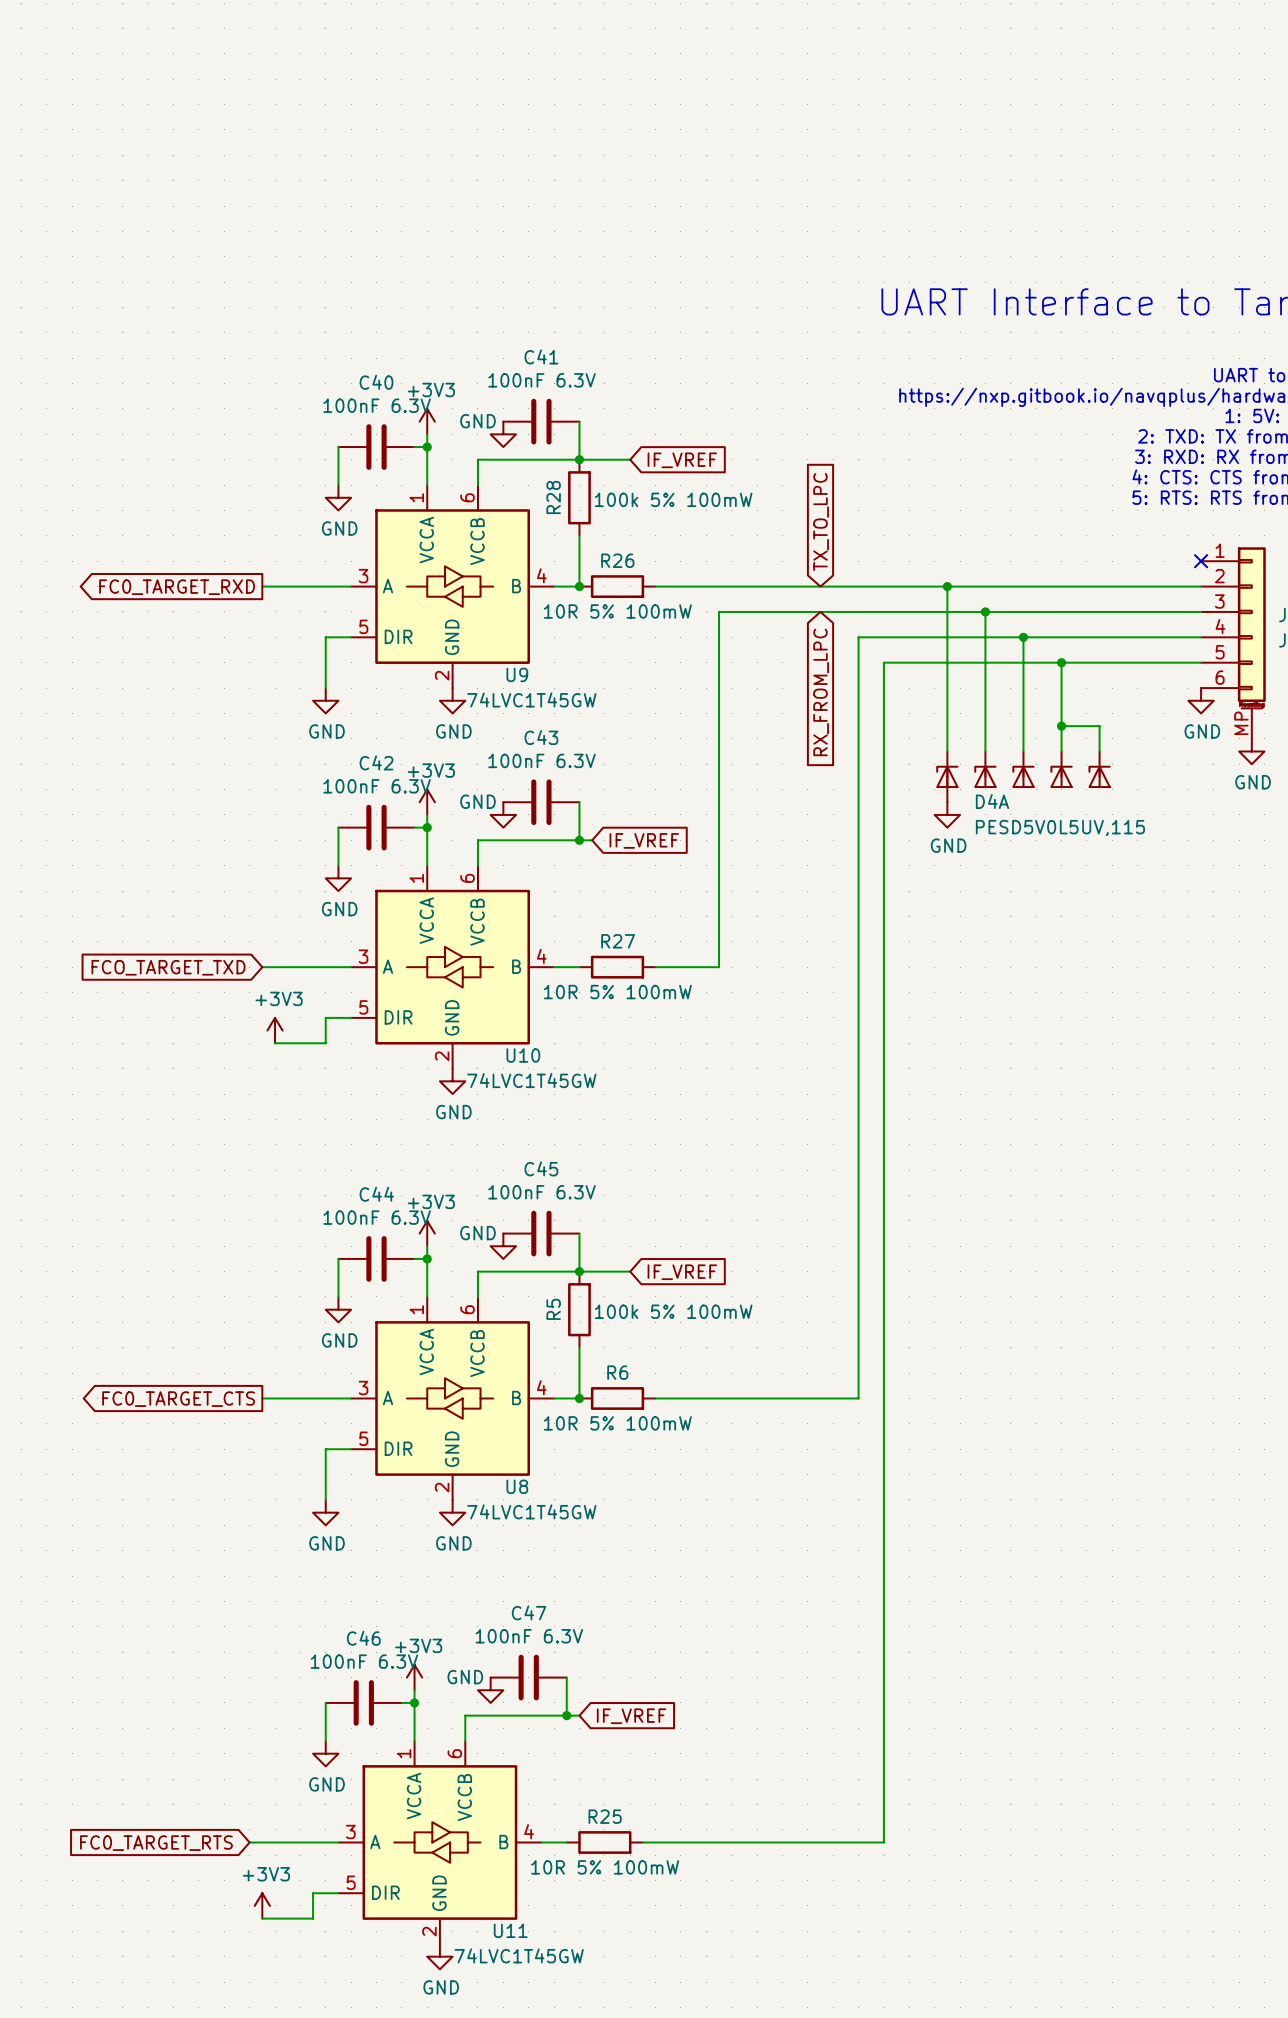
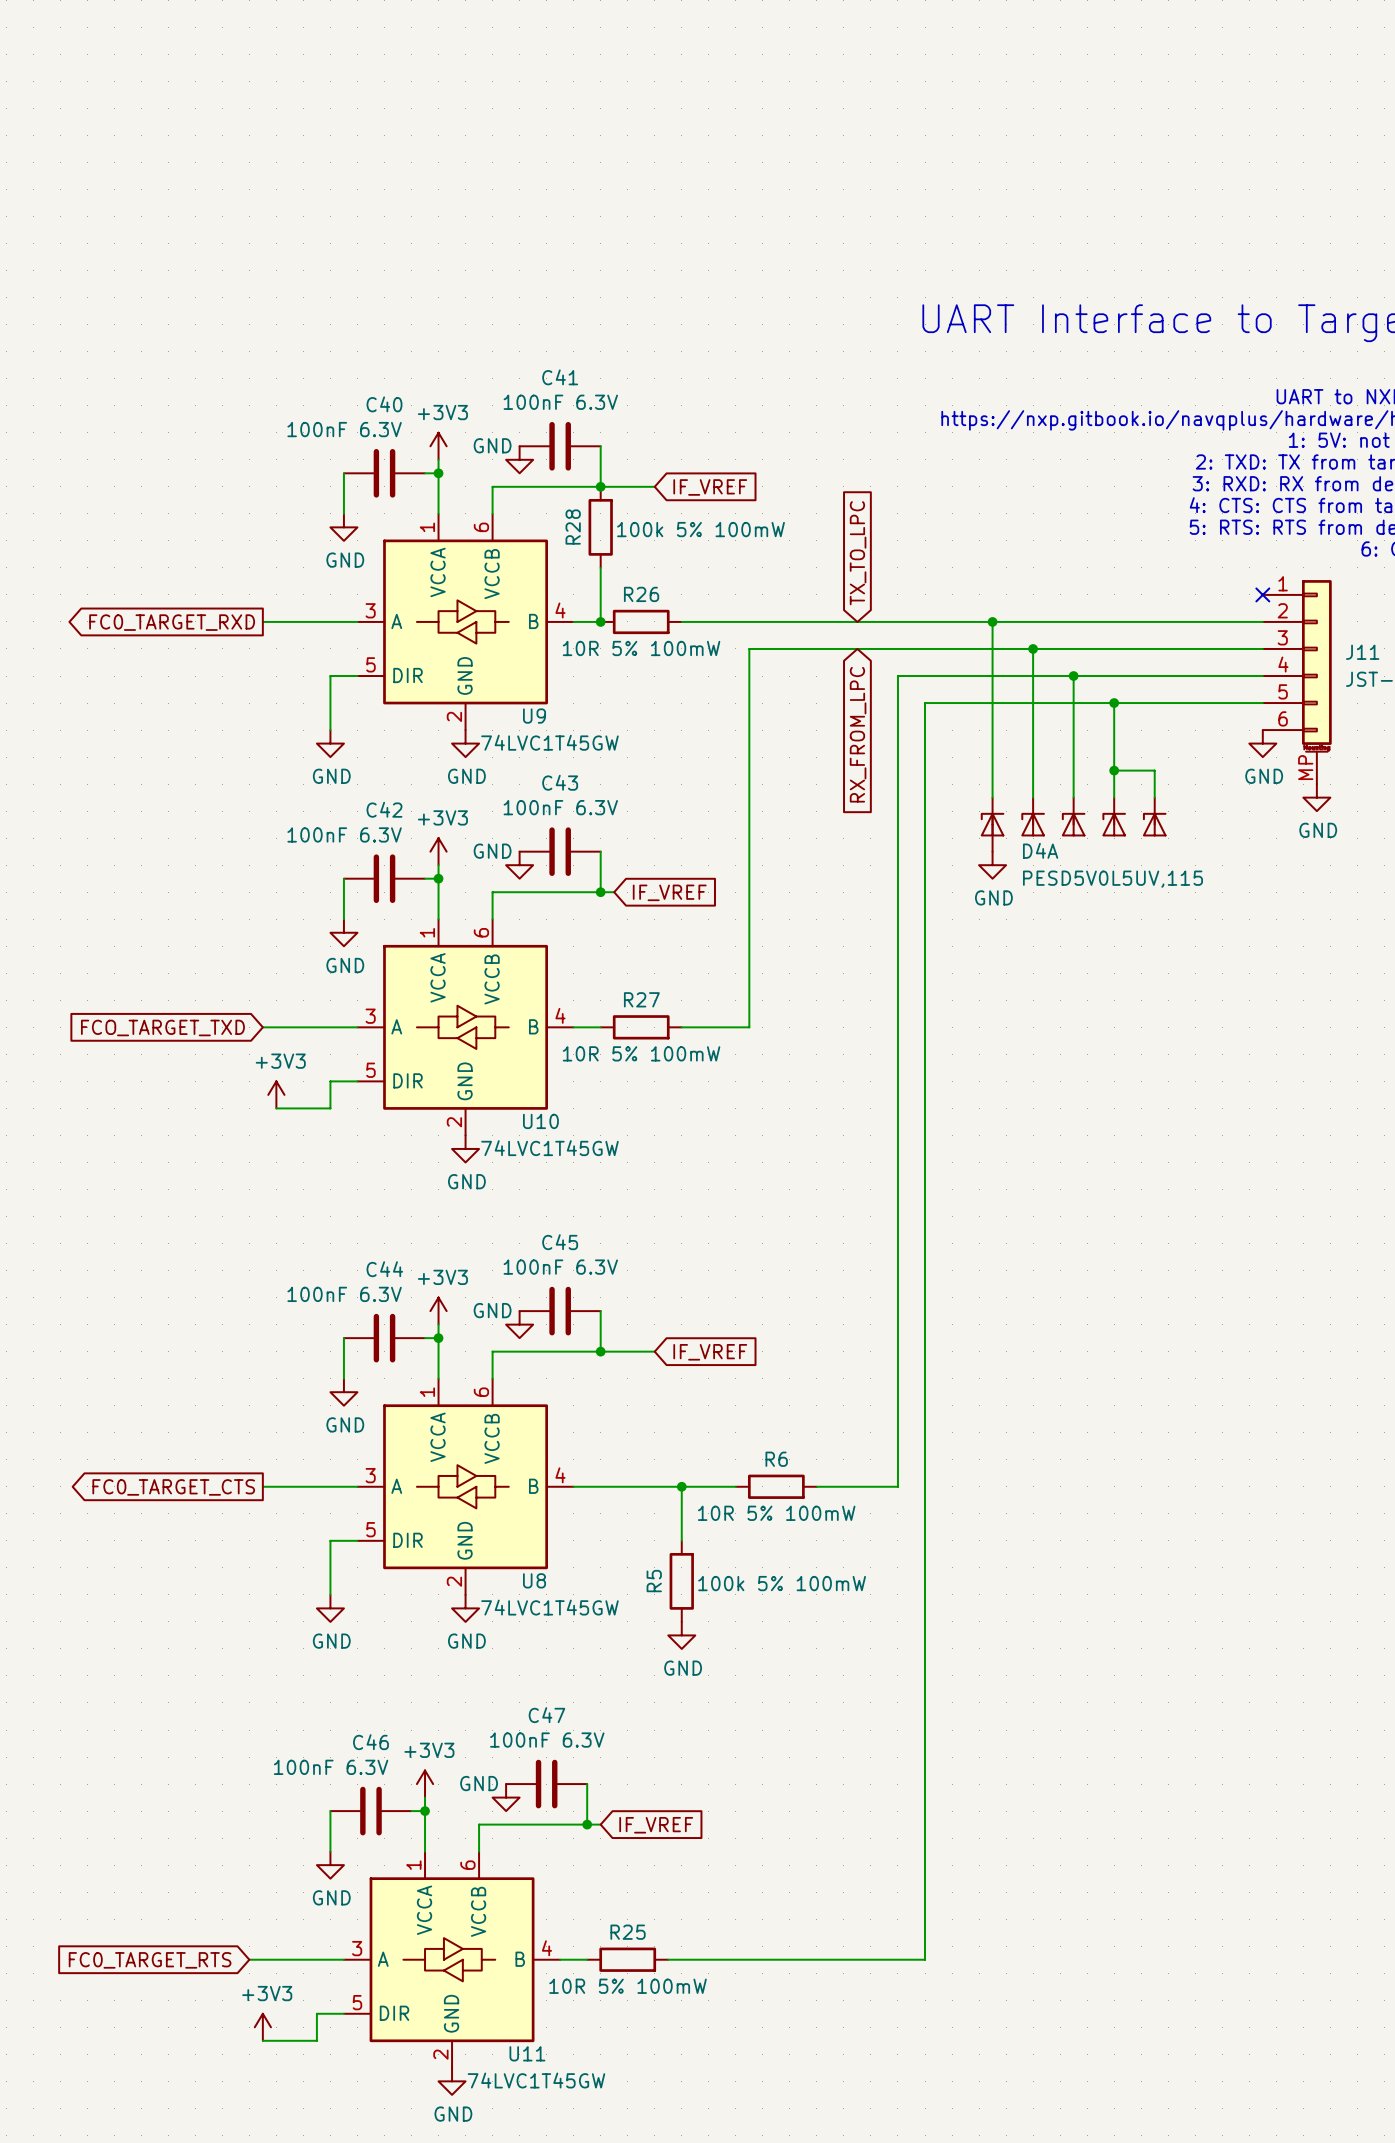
C40 value position: 100nF 6.3V (377, 405) -> 100nF 6.3V (344, 429)
C42 value position: 100nF 6.3V (377, 786) -> 100nF 6.3V (344, 834)
C44 value position: 100nF 6.3V (377, 1217) -> 100nF 6.3V (344, 1294)
R5 position: (579, 1309) -> (681, 1581)
wire: (579, 1347) (579, 1398) -> (681, 1540) (681, 1486) (600, 1486)
junction: (579, 1398) -> none
R6 position: (617, 1398) -> (776, 1486)
junction: none -> (681, 1486)
wire: (706, 1398) (782, 1398) -> none
power symbol: none -> GND (681, 1635)
C46 value position: 100nF 6.3V (364, 1661) -> 100nF 6.3V (331, 1767)

